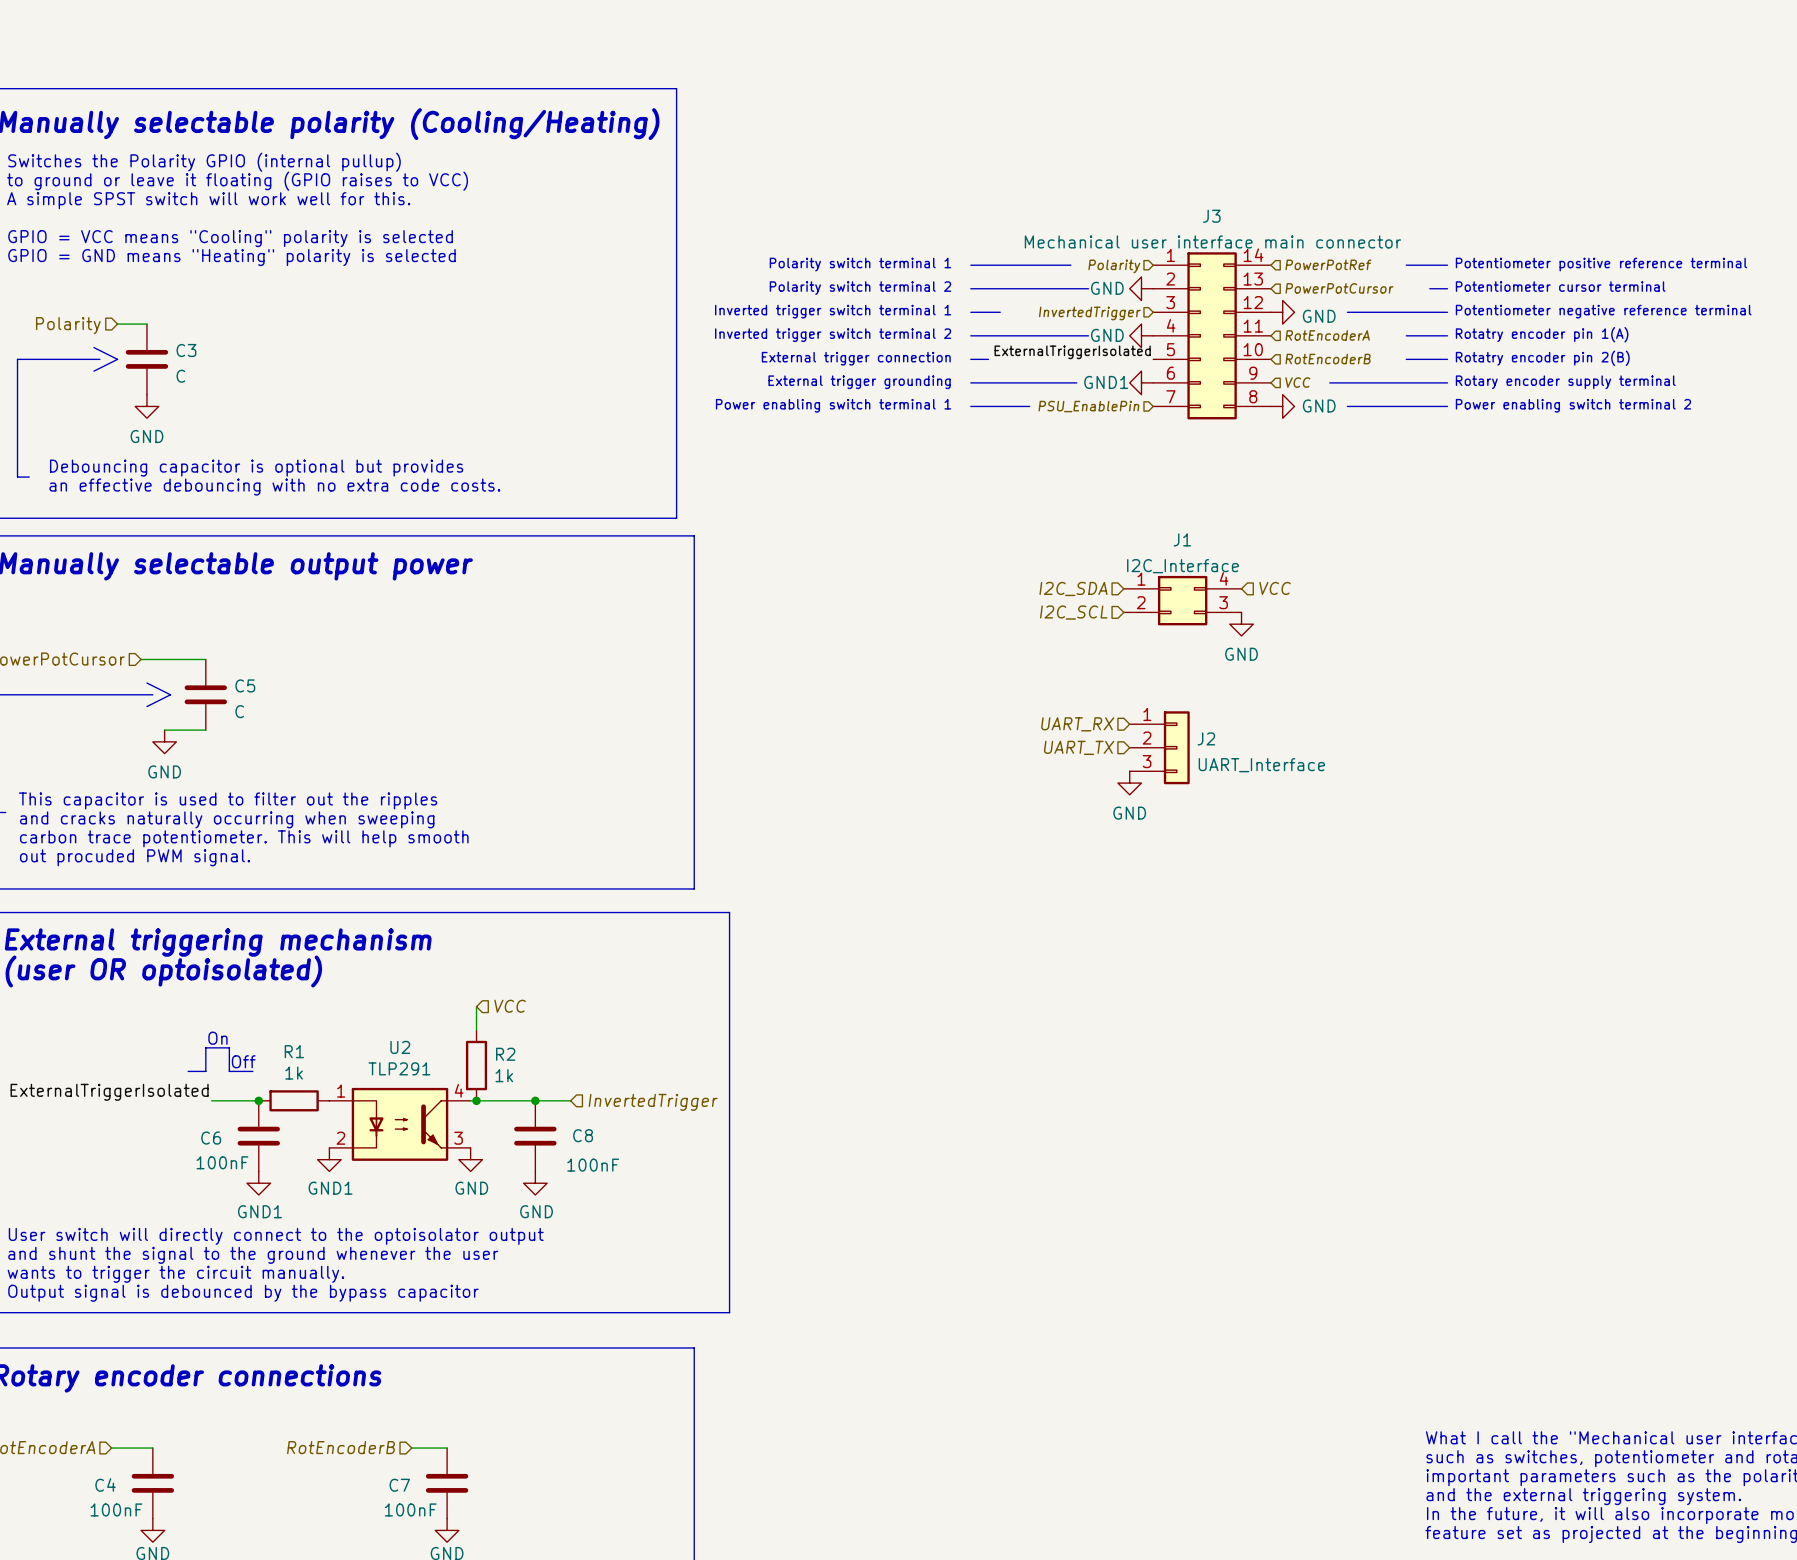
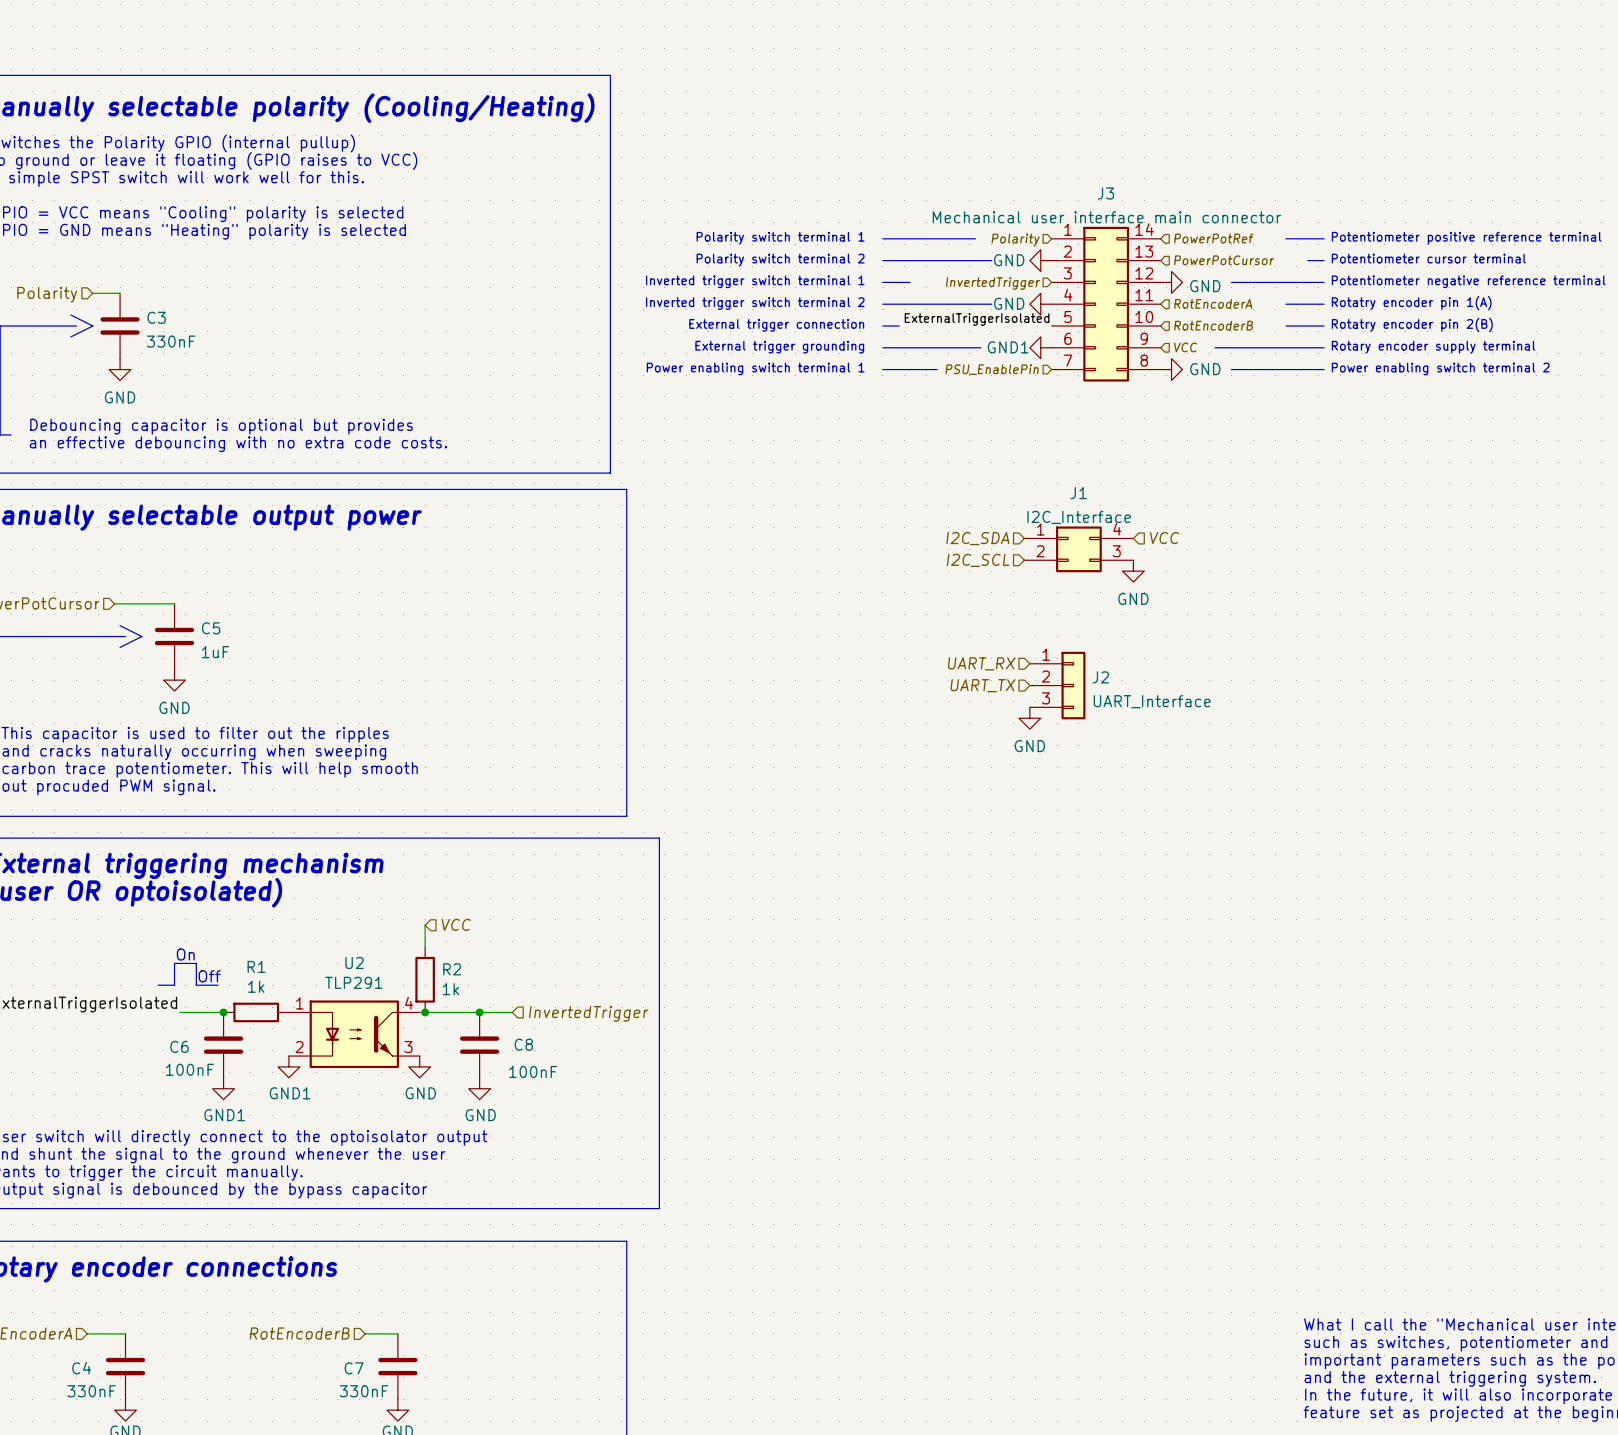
C3 value: C (180, 376) -> 330nF (171, 341)
C5 value: C (239, 711) -> 1uF (215, 652)
wire: (164, 730) (205, 730) -> none
power symbol position: GND (164, 741) -> GND (174, 680)
C4 value: 100nF (116, 1509) -> 330nF (91, 1391)
C7 value: 100nF (410, 1509) -> 330nF (364, 1391)

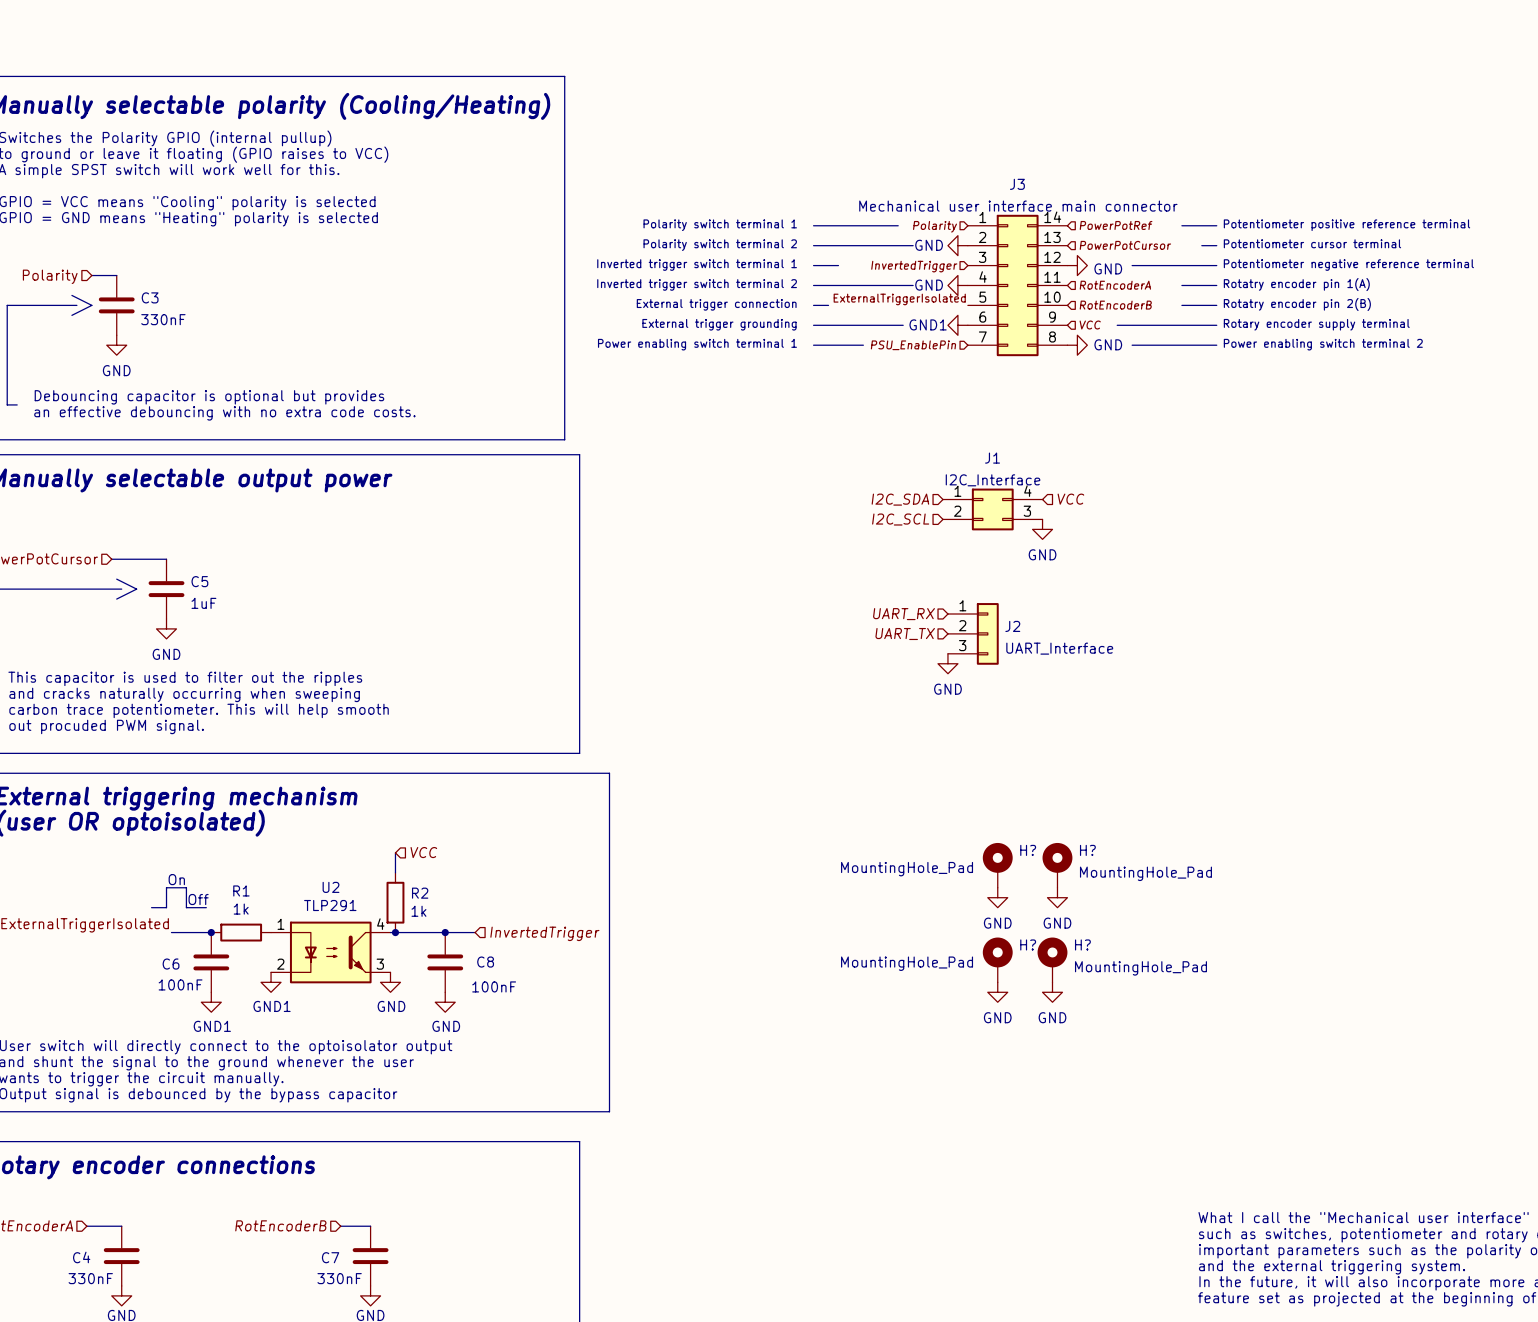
H?: none -> MountingHole_Pad (997, 865)
H?: none -> MountingHole_Pad (1057, 865)
power symbol: none -> GND (997, 897)
power symbol: none -> GND (1057, 897)
H?: none -> MountingHole_Pad (997, 959)
H?: none -> MountingHole_Pad (1052, 959)
power symbol: none -> GND (997, 992)
power symbol: none -> GND (1052, 992)

